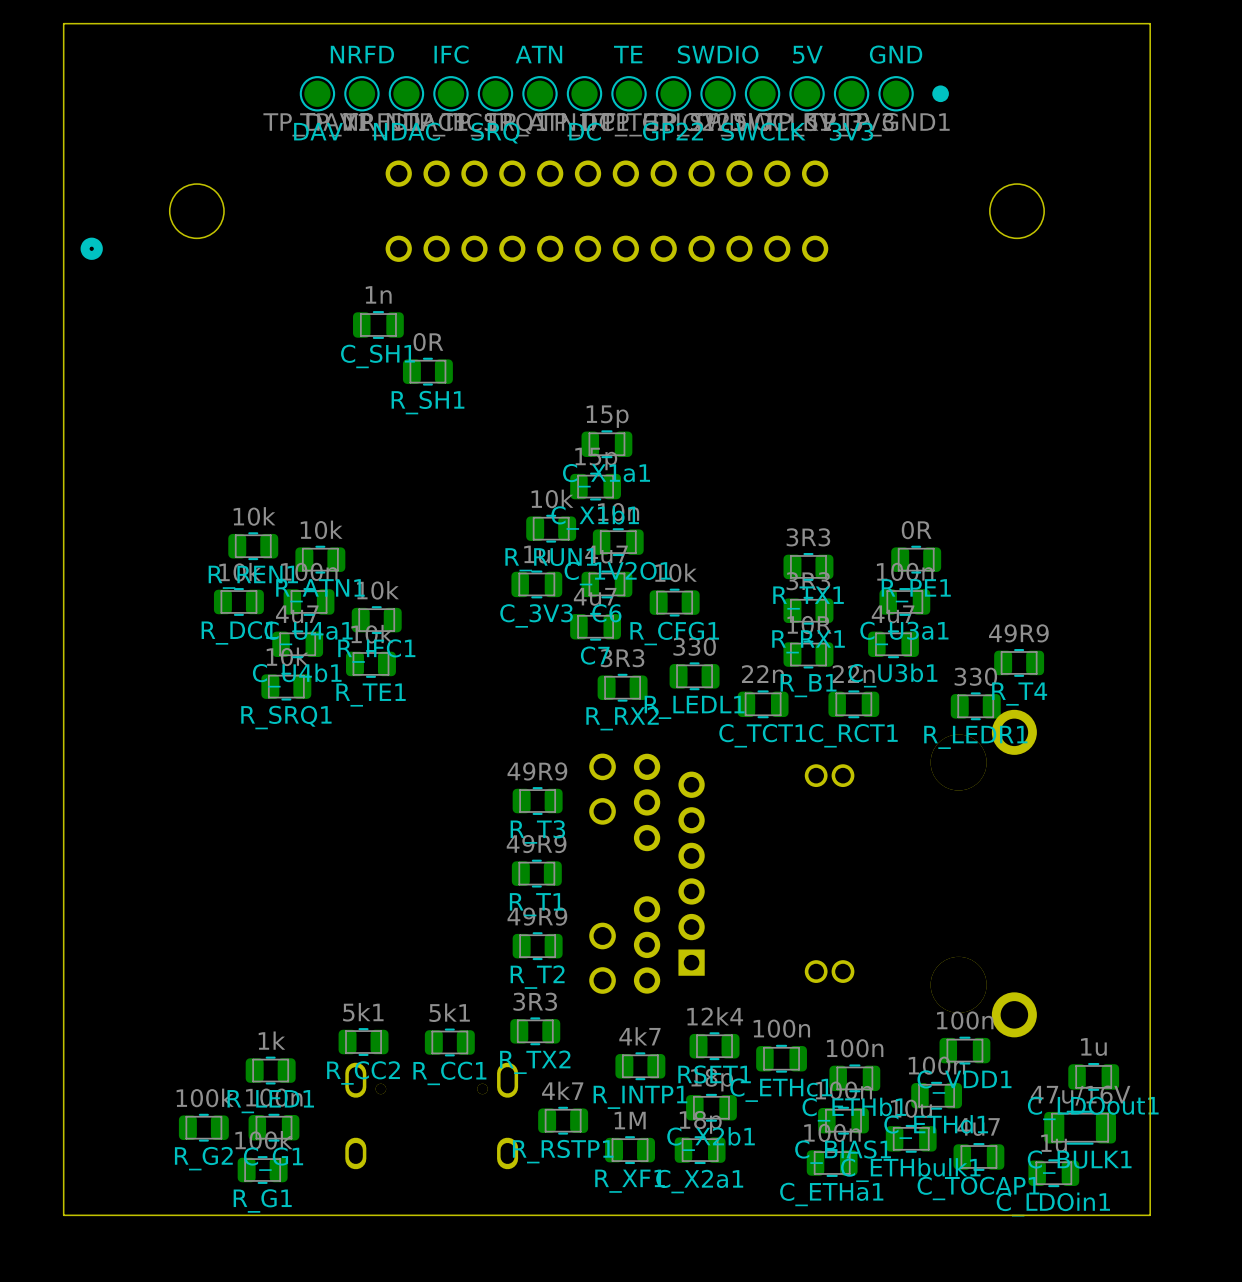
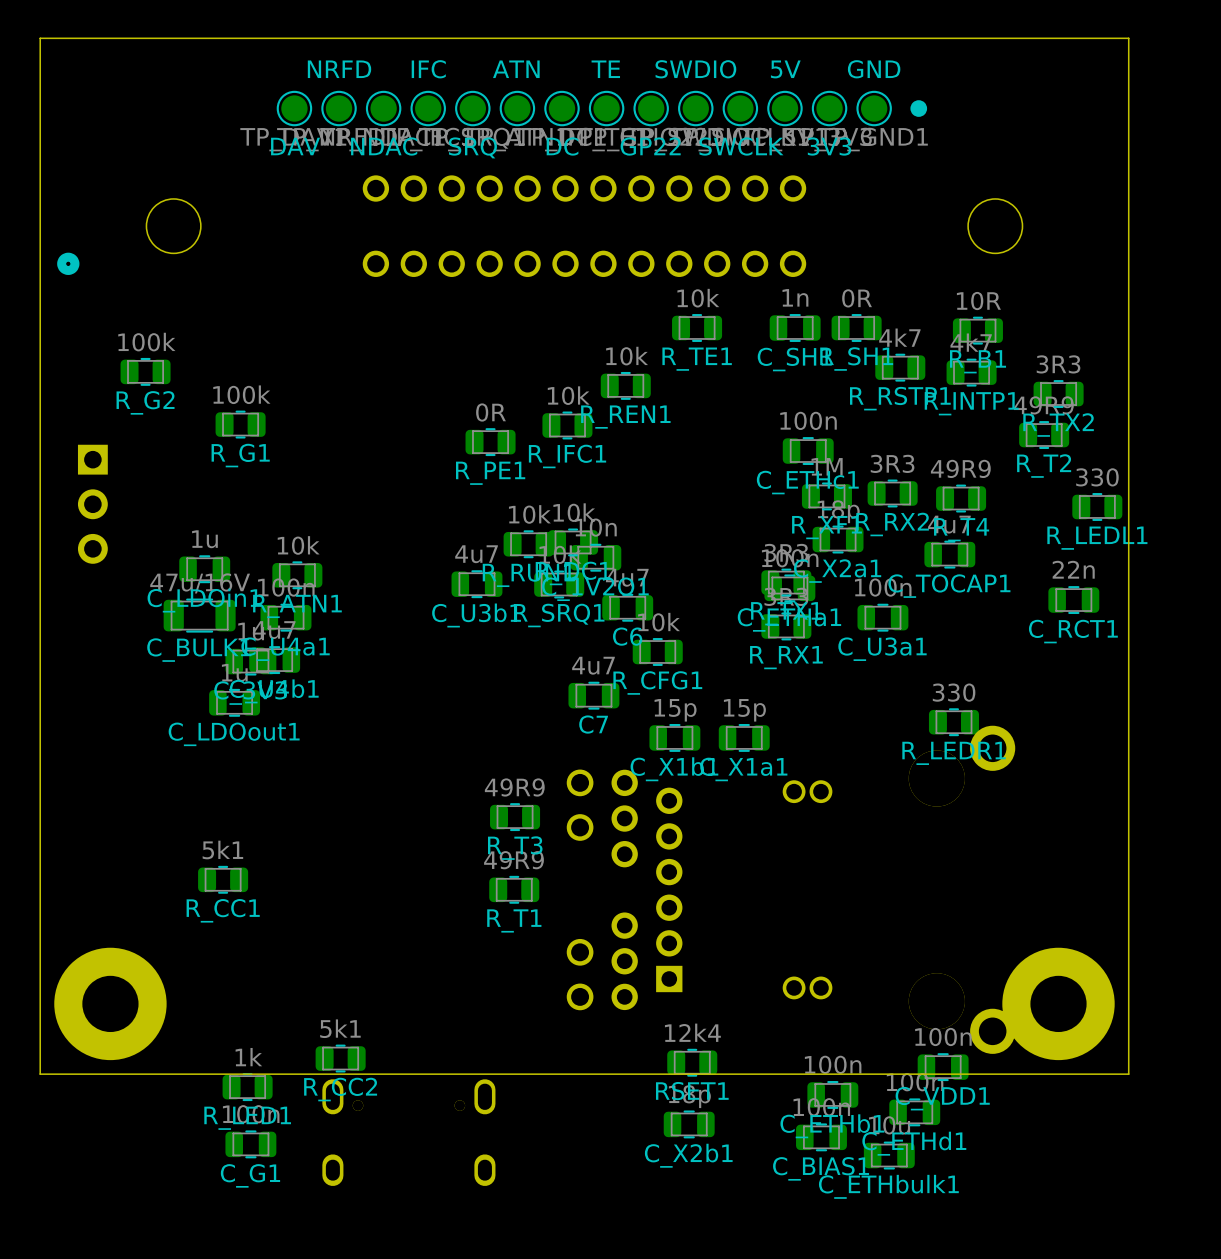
C_SH1 position: (378, 325) -> (795, 328)
R_SH1 position: (427, 371) -> (856, 328)
C_X1a1 position: (606, 444) -> (744, 737)
C_X1b1 position: (595, 486) -> (674, 737)
part: none -> (92, 504)
R_REN1 position: (253, 546) -> (625, 385)
R_PE1 position: (916, 559) -> (490, 442)
C_3V3 position: (536, 584) -> (250, 661)
C6 position: (606, 584) -> (627, 607)
R_DC1 position: (238, 601) -> (573, 542)
R_CFG1 position: (674, 602) -> (657, 651)
R_IFC1 position: (376, 620) -> (567, 425)
C7 position: (595, 626) -> (593, 695)
C_U3b1 position: (893, 644) -> (476, 584)
R_B1 position: (808, 654) -> (977, 330)
R_T4 position: (1019, 662) -> (961, 498)
R_TE1 position: (370, 663) -> (697, 328)
R_LEDL1 position: (694, 676) -> (1097, 506)
R_SRQ1 position: (286, 686) -> (559, 584)
R_RX2 position: (622, 687) -> (892, 493)
C_TCT1: 22n (763, 704) -> none
C_RCT1 position: (853, 704) -> (1073, 600)
R_T2 position: (537, 946) -> (1044, 435)
part: none -> (110, 1003)
part: none -> (1058, 1003)
R_TX2 position: (535, 1031) -> (1058, 394)
R_CC1 position: (449, 1042) -> (223, 879)
board edge: (1150, 1057) (1150, 1215) (63, 1215) (63, 1057) -> (1128, 1074) (40, 1074)
C_ETHc1 position: (781, 1058) -> (808, 451)
R_INTP1 position: (640, 1066) -> (971, 372)
C_LDOout1 position: (1093, 1076) -> (234, 702)
R_RSTP1 position: (563, 1120) -> (900, 367)
R_G2 position: (203, 1127) -> (145, 371)
C_BULK1 position: (1080, 1127) -> (199, 615)
R_XF1 position: (630, 1150) -> (826, 496)
C_X2a1 position: (700, 1150) -> (838, 539)
C_TOCAP1 position: (978, 1156) -> (949, 554)
C_ETHa1 position: (832, 1163) -> (789, 588)
R_G1 position: (262, 1170) -> (240, 424)
C_LDOin1 position: (1053, 1173) -> (204, 569)

